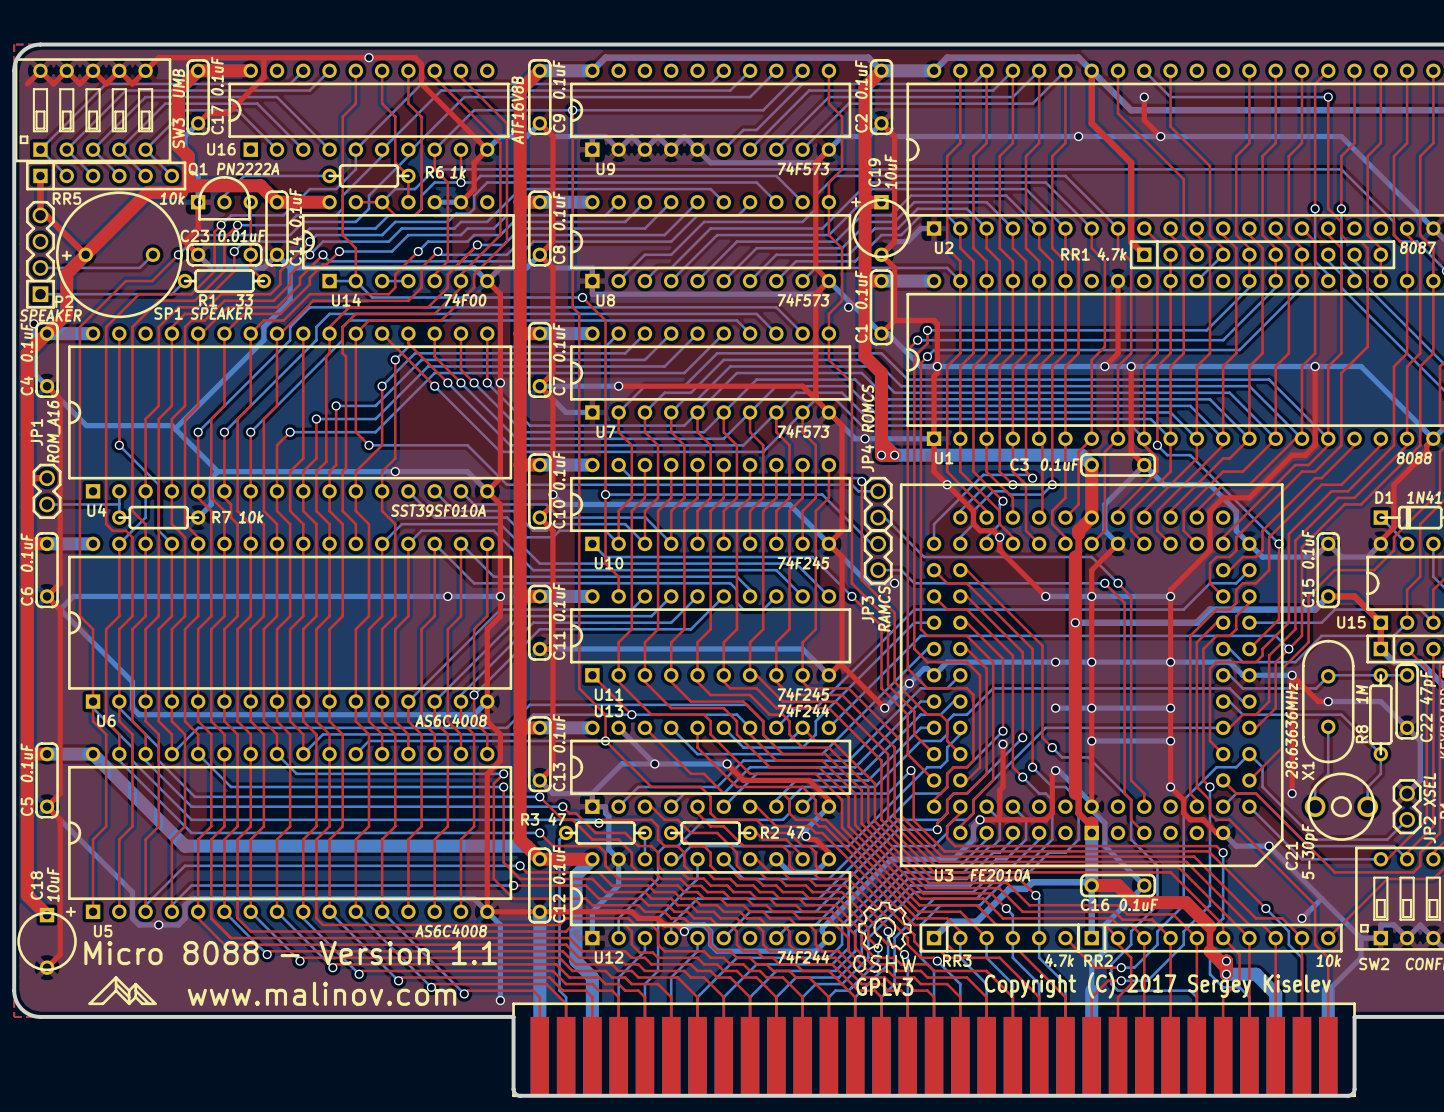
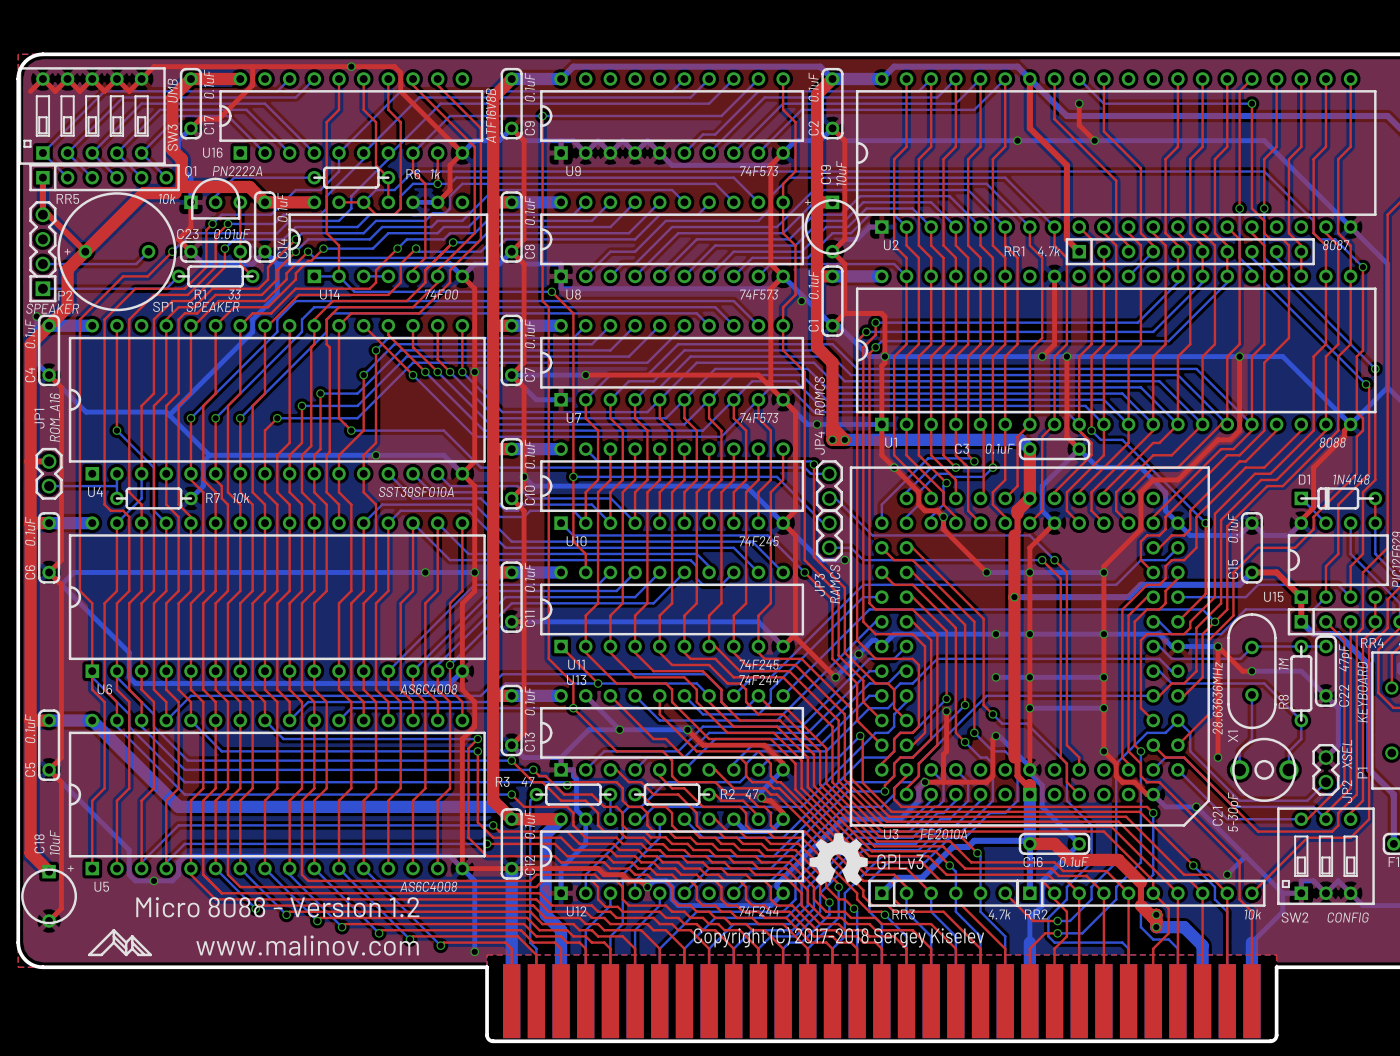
drawing: none -> [809, 833, 868, 886]
text: none -> GPLv3 (900, 861)
GPLv3: (884, 937) -> none
text: Micro 8088 - Version 1.1 (290, 953) -> Micro 8088 - Version 1.2 (277, 907)
text: none -> Copyright (C) 2017-2018 Sergey Kiselev (839, 937)
text: Copyright (C) 2017 Sergey Kiselev (1157, 985) -> none
part footprint: [512, 1002, 1356, 1098] -> [503, 964, 1261, 1039]

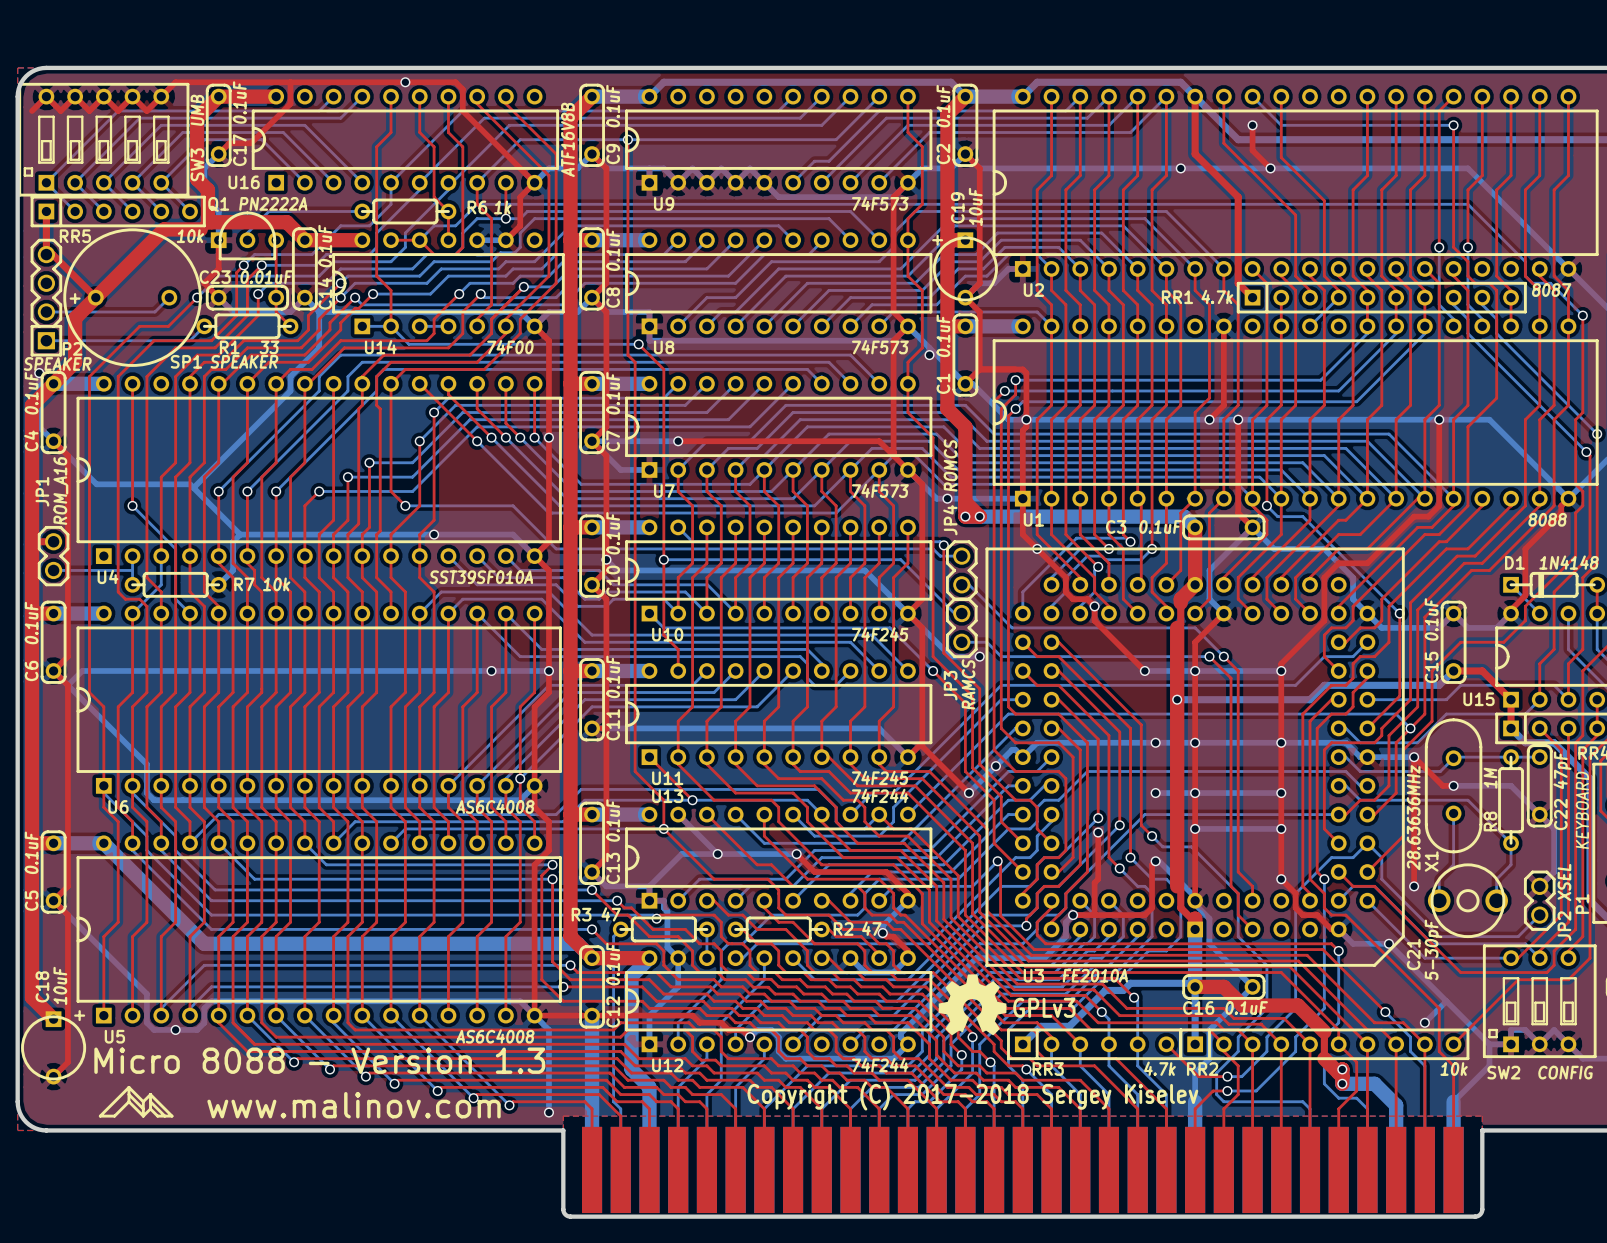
text: Micro 8088 - Version 1.2 (277, 907) -> Micro 8088 - Version 1.3 (319, 1060)

